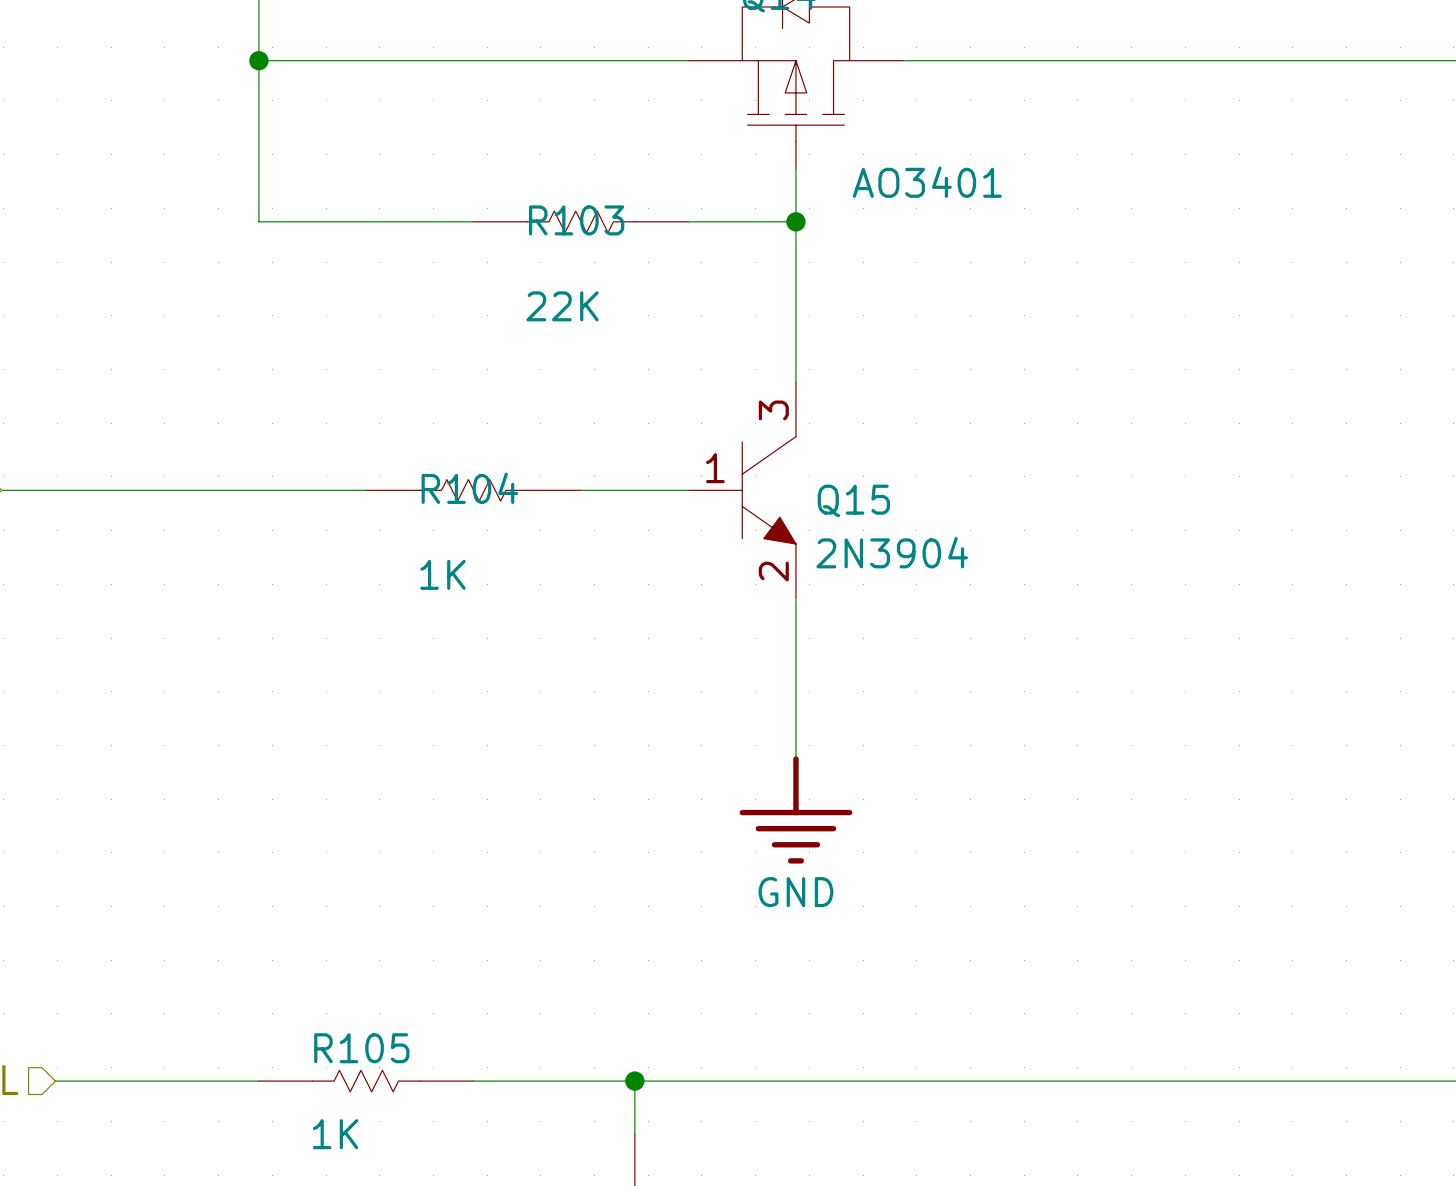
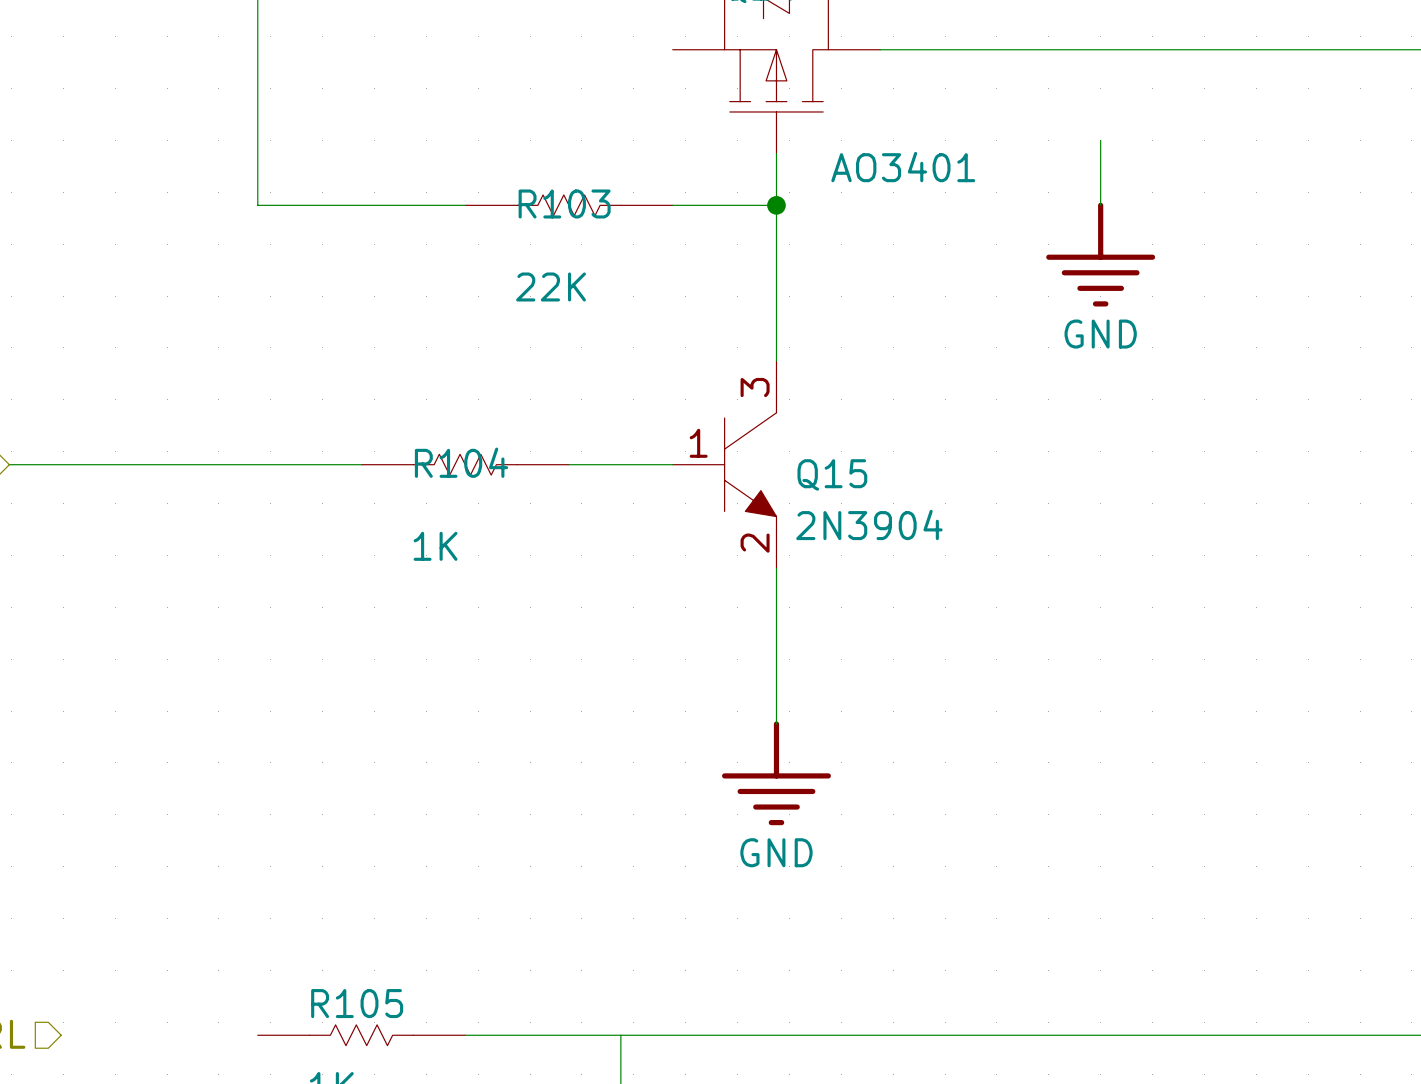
wire: (258, 60) (688, 60) -> none
junction: (258, 60) -> none
wire: none -> (1100, 140) (1100, 205)
power symbol: none -> GND (1100, 254)
wire: (55, 1081) (258, 1081) -> none
junction: (634, 1081) -> none

